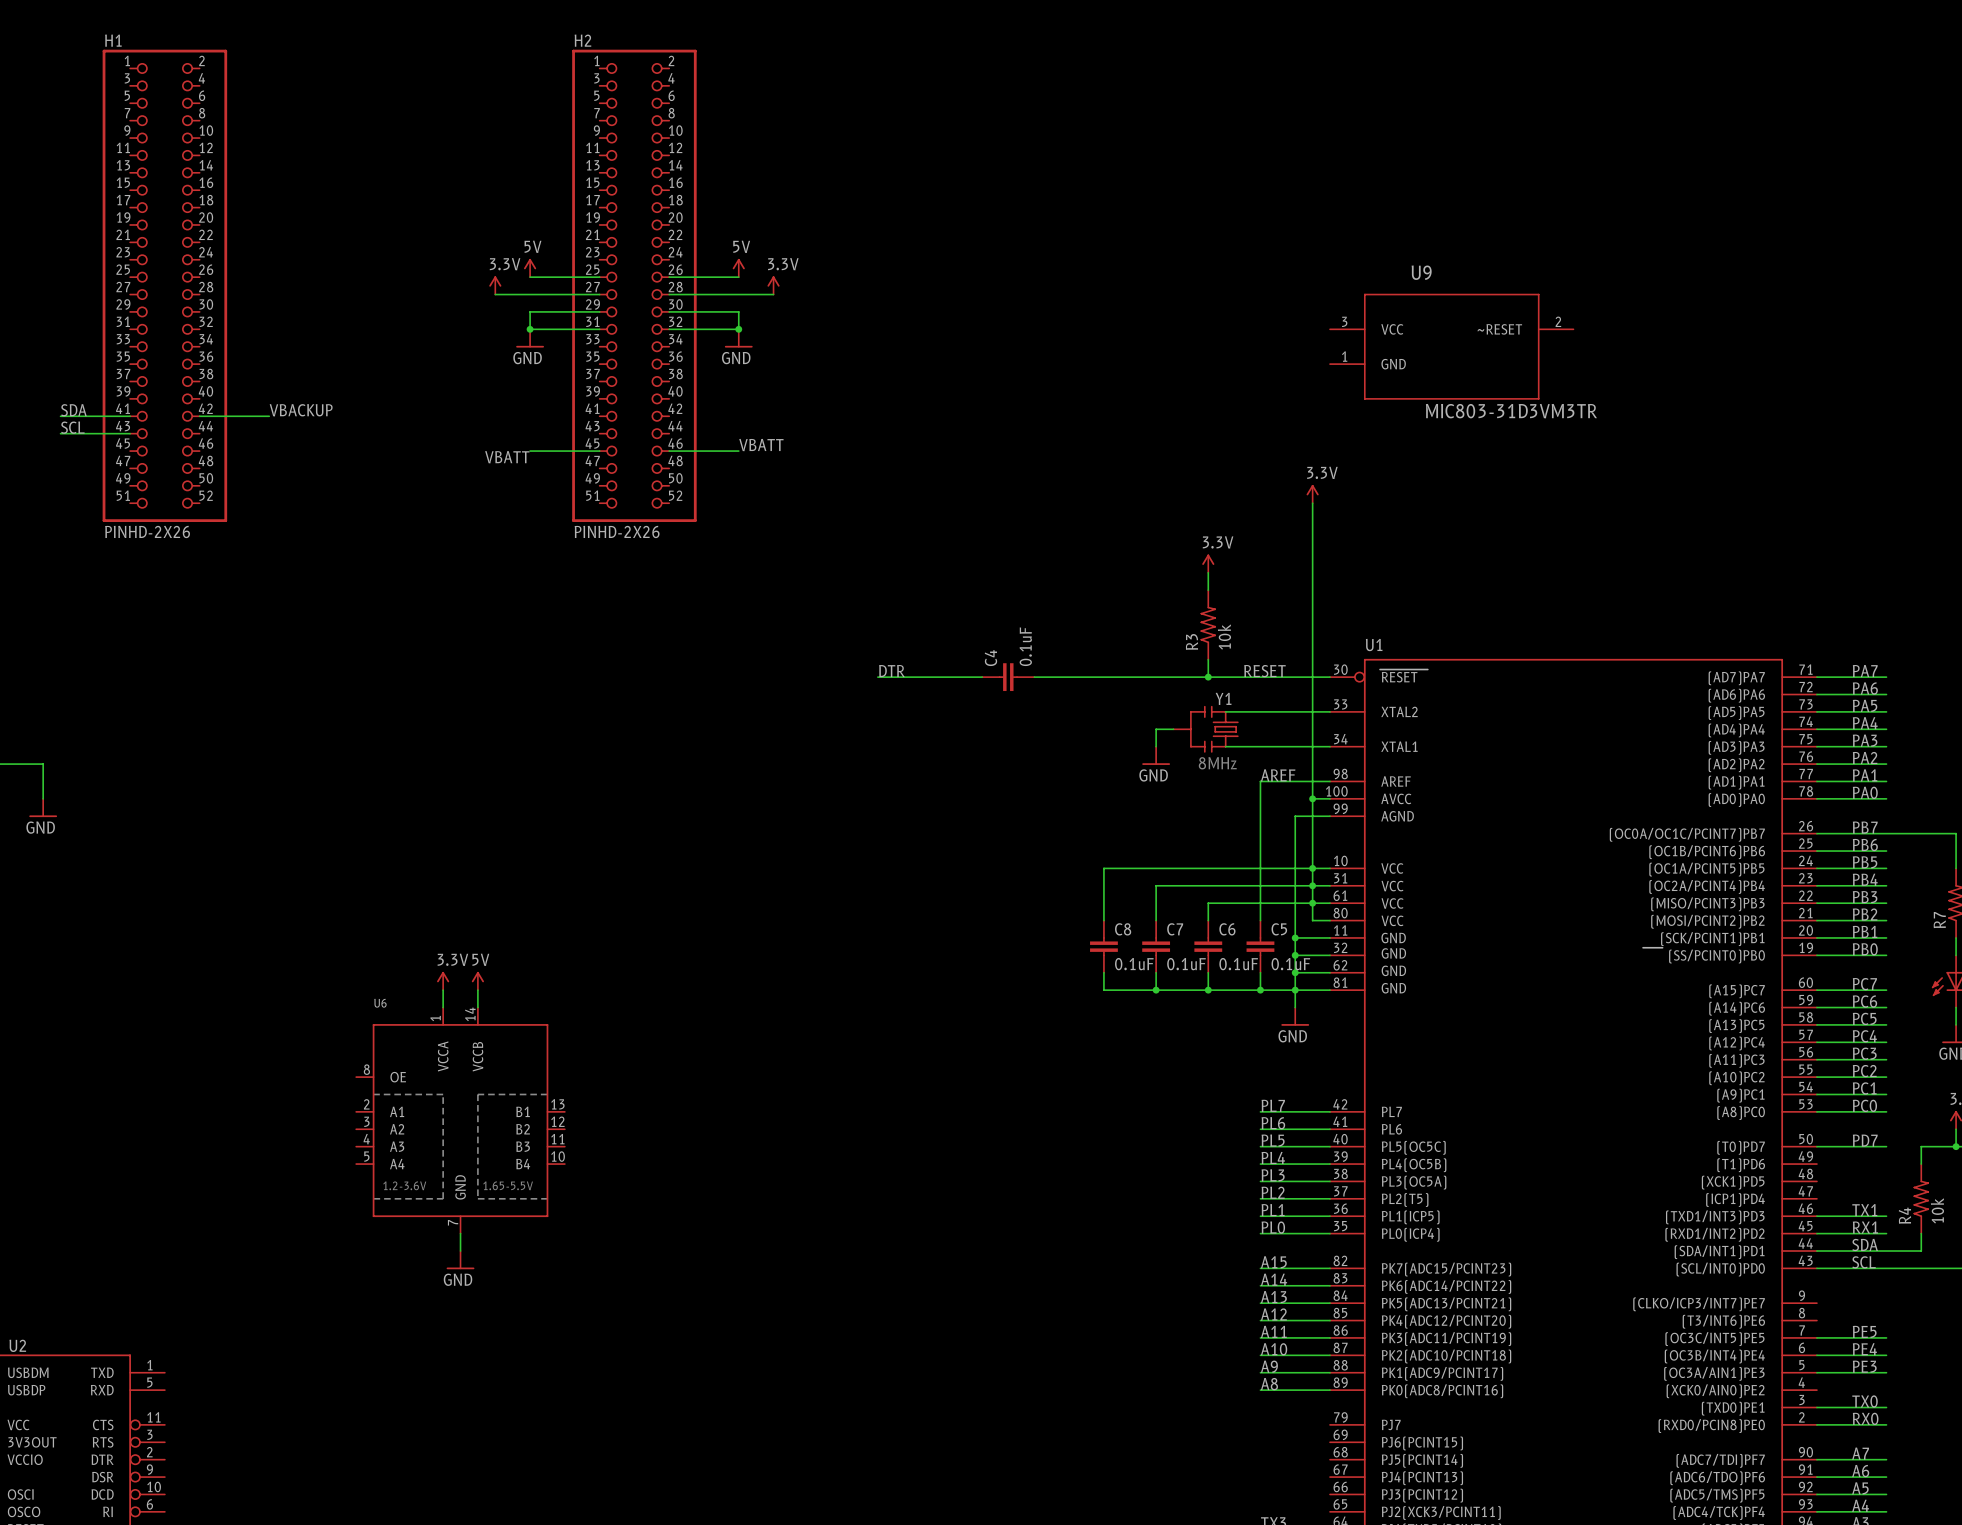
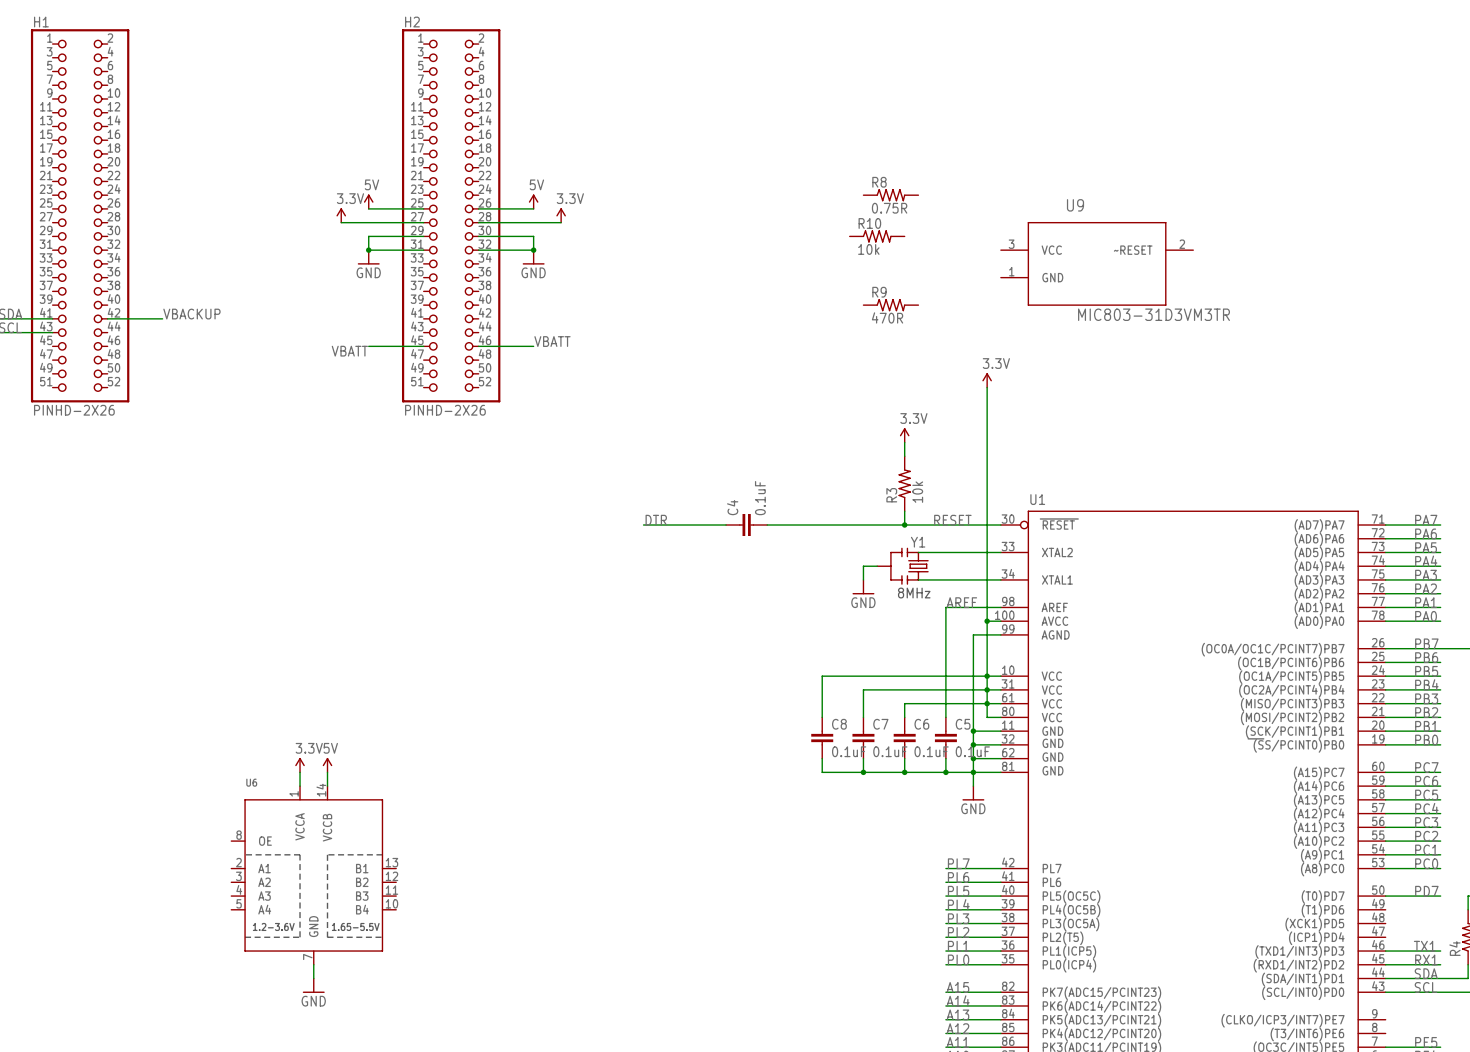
R8: none -> 0.75R (890, 195)
R10: none -> 10k (877, 236)
R9: none -> 470R (890, 305)

